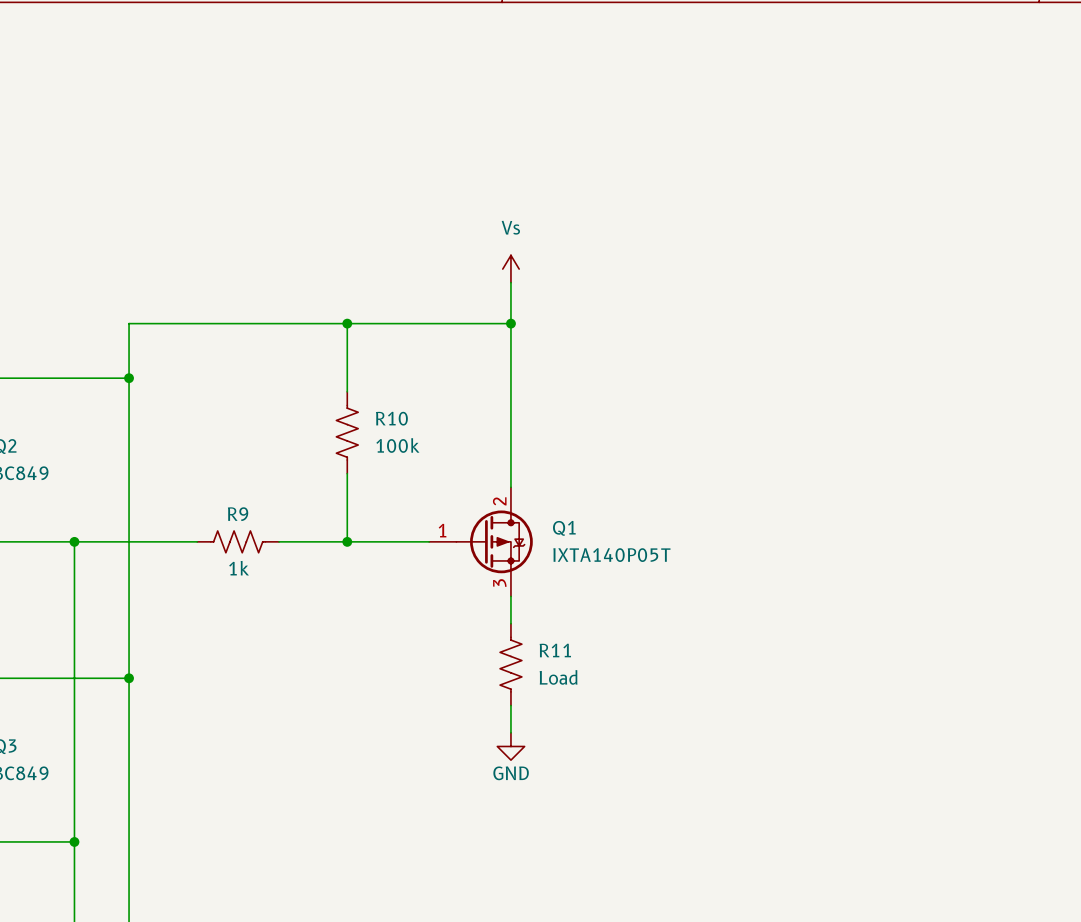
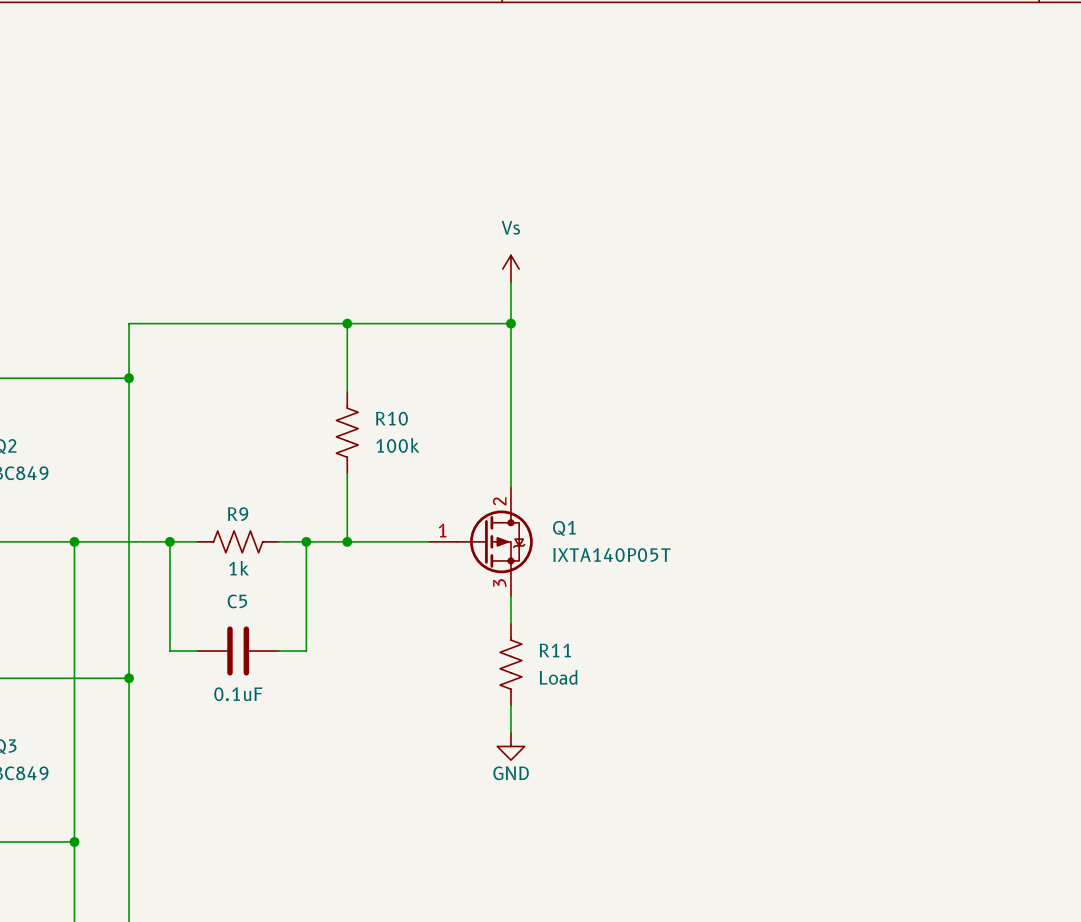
wire: none -> (169, 541) (169, 651) (197, 651)
junction: none -> (169, 541)
wire: none -> (306, 541) (306, 651) (279, 651)
junction: none -> (306, 541)
C5: none -> 0.1uF (238, 651)

